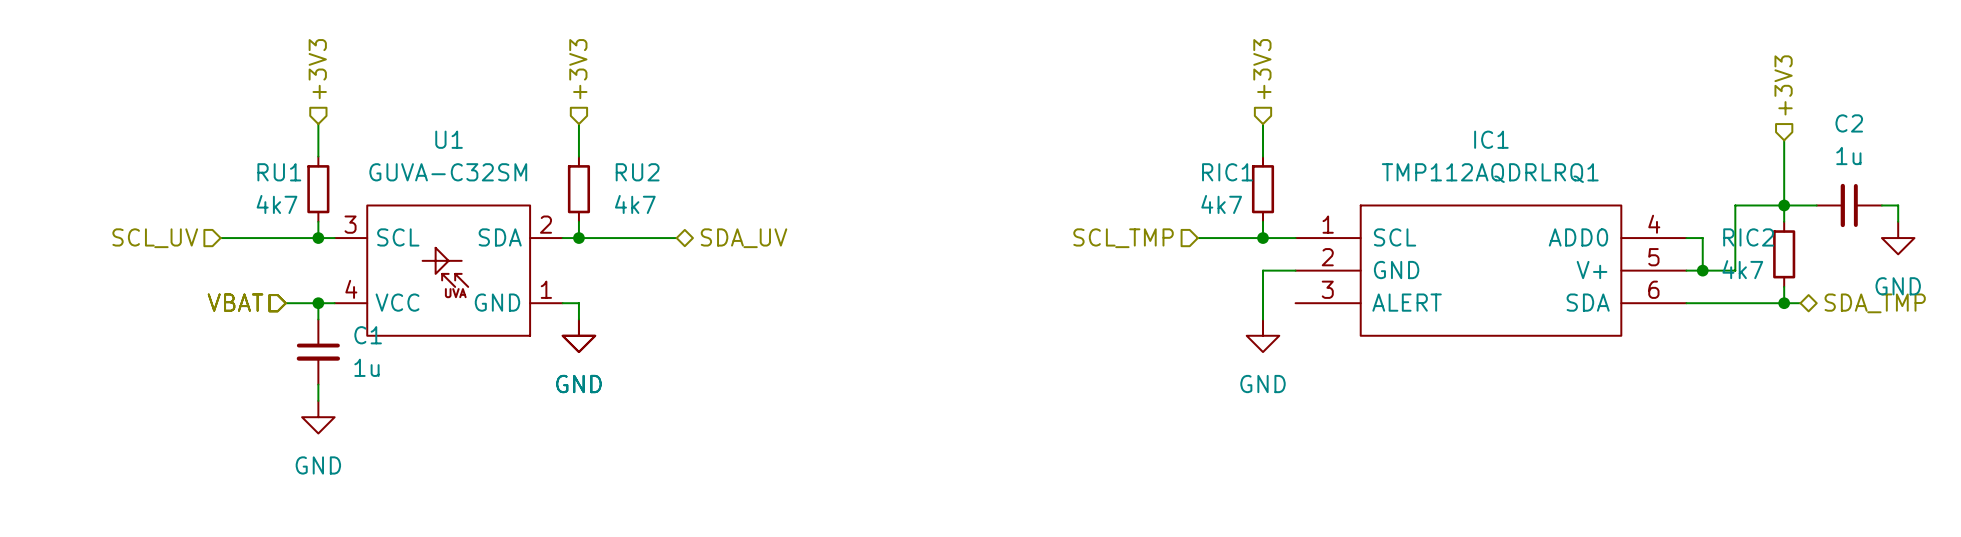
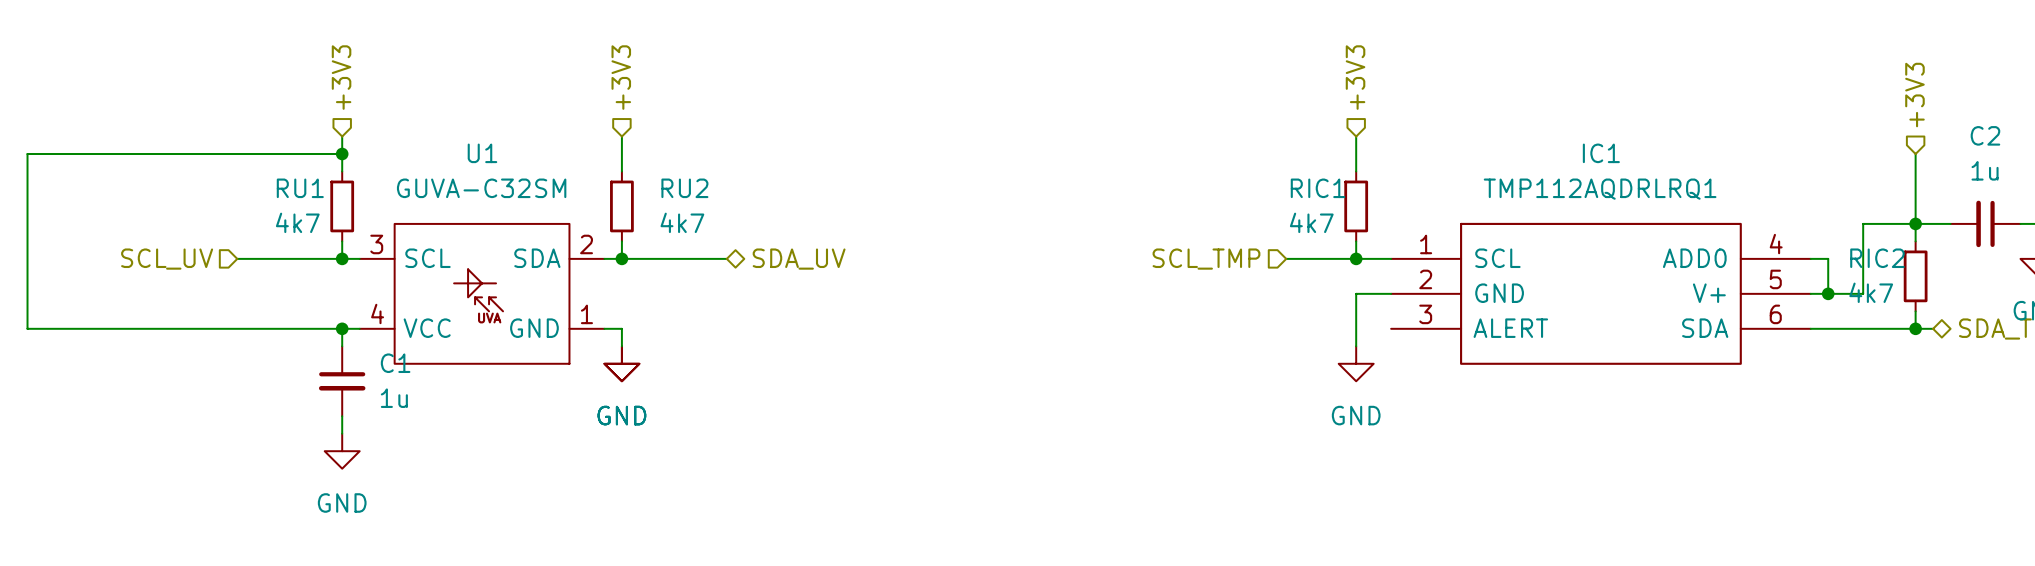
wire: none -> (342, 153) (27, 153) (27, 328) (307, 328)
junction: none -> (342, 153)
hierarchical label: VBAT (235, 302) -> none

